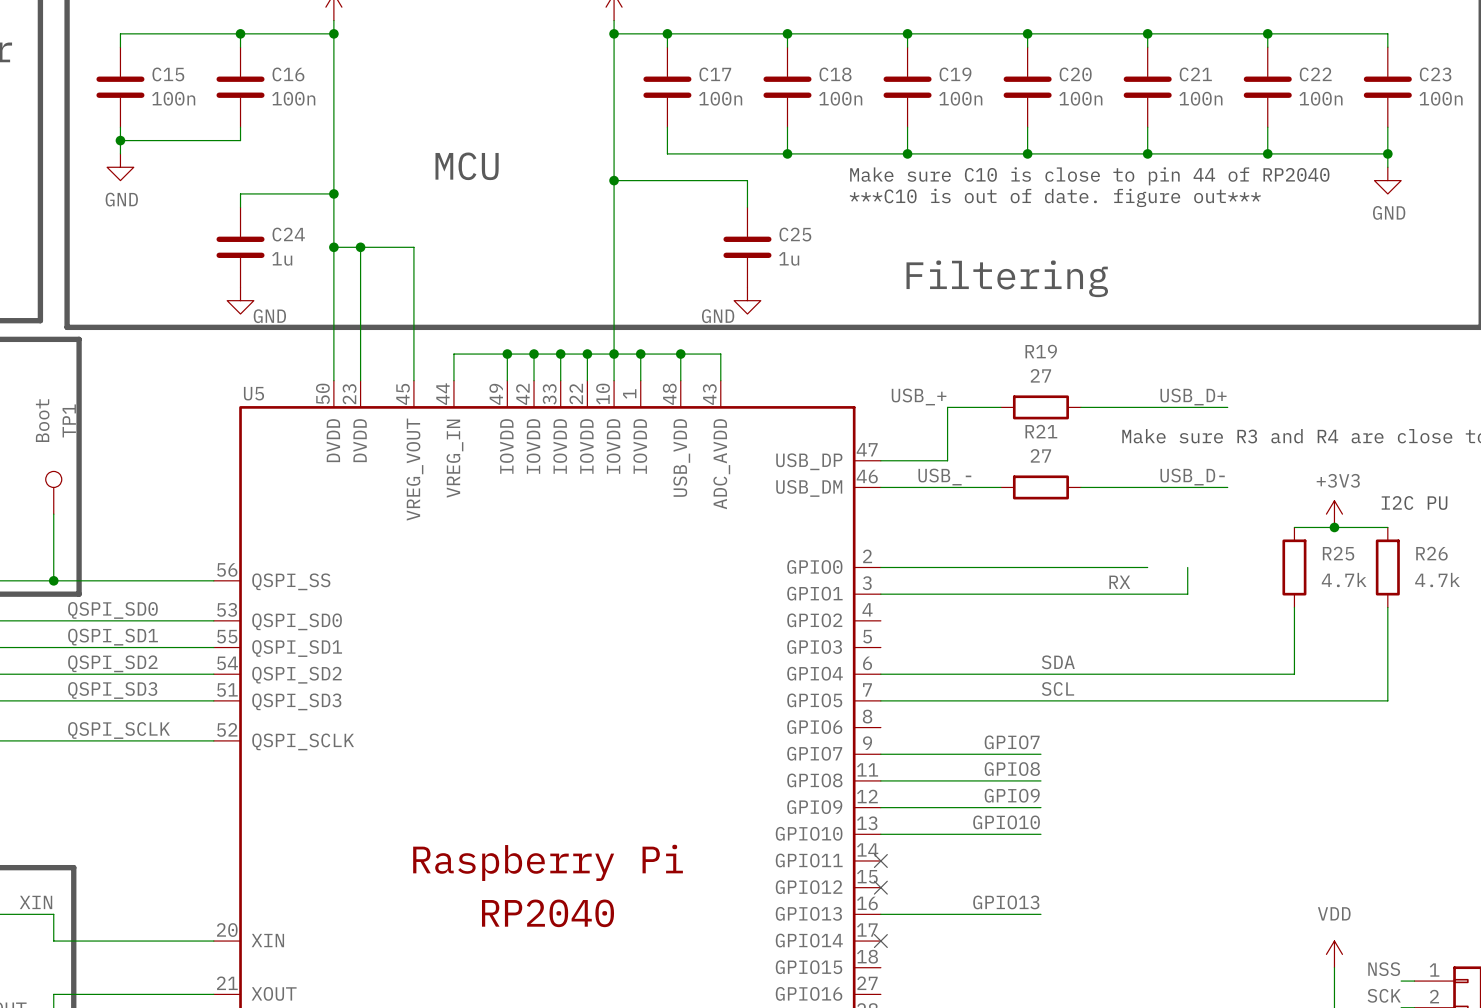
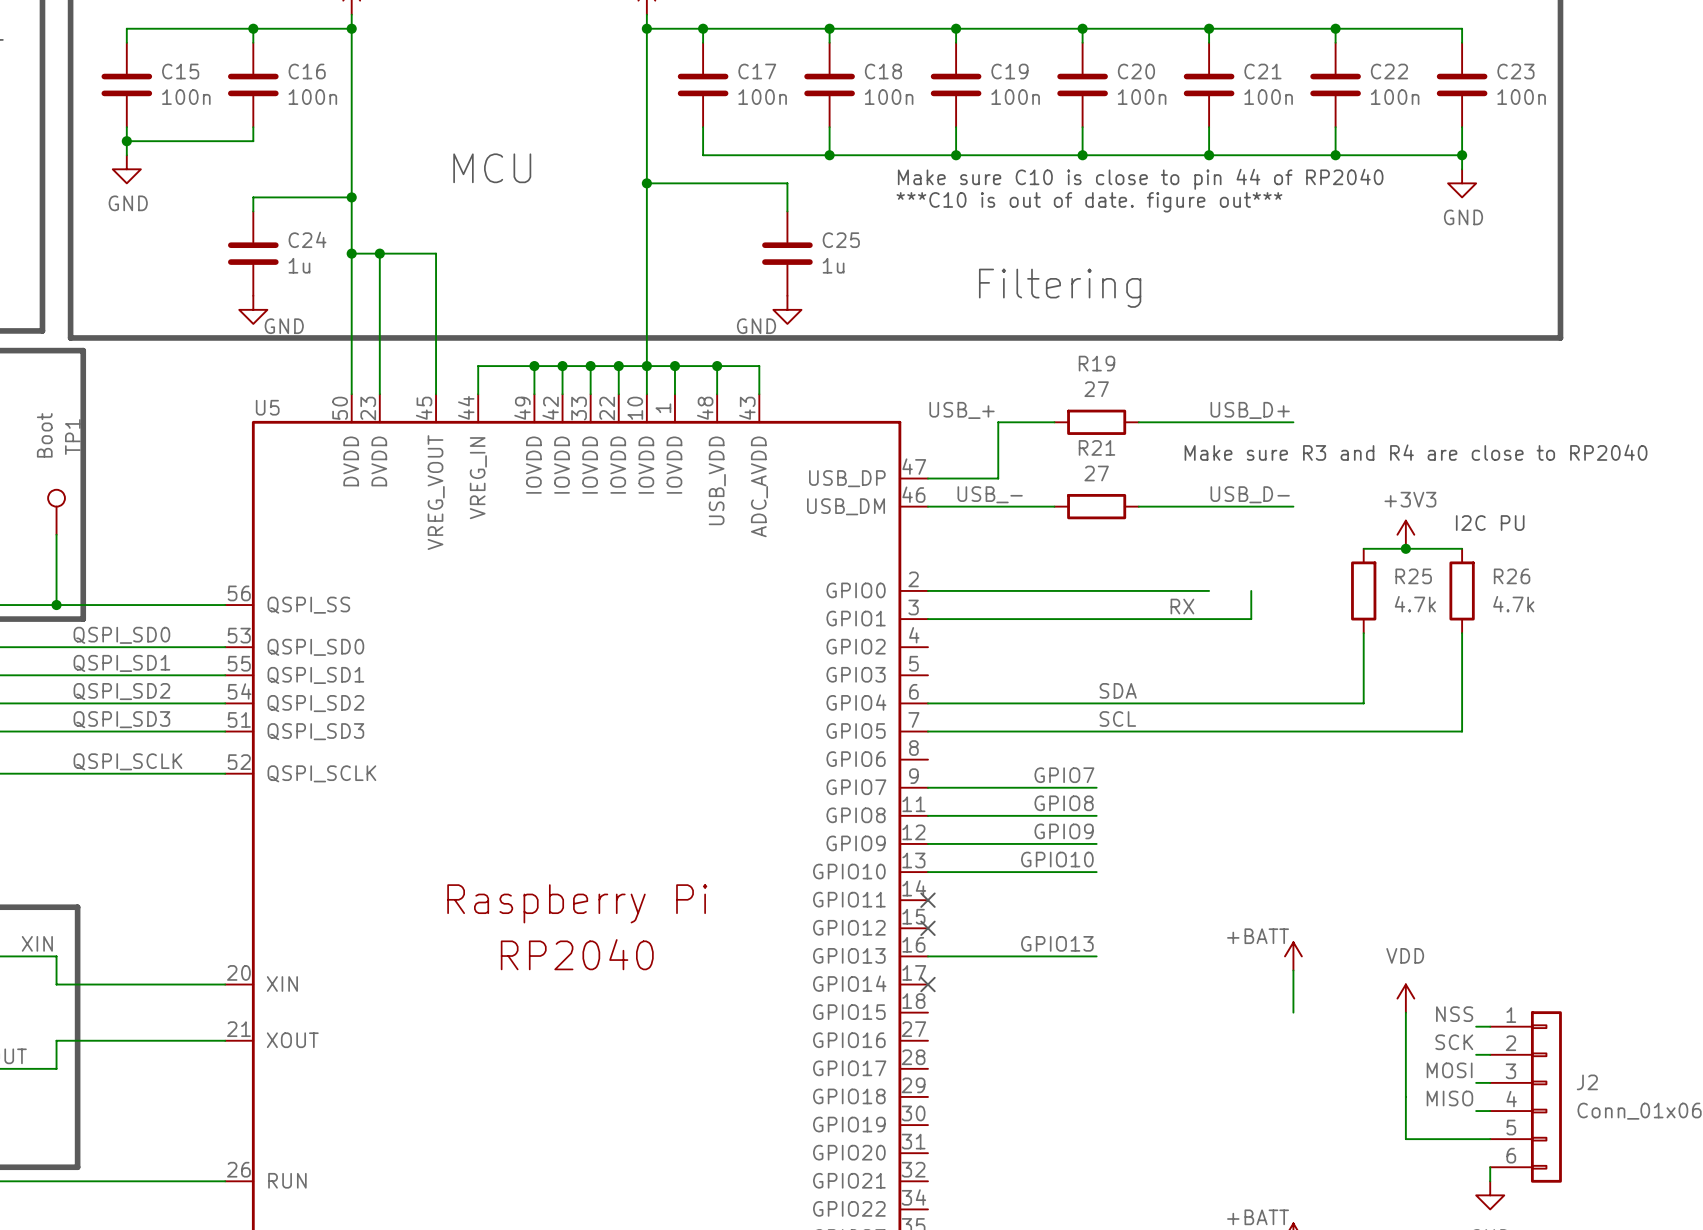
power symbol: none -> +BATT (1293, 956)
wire: none -> (1293, 970) (1293, 1012)

